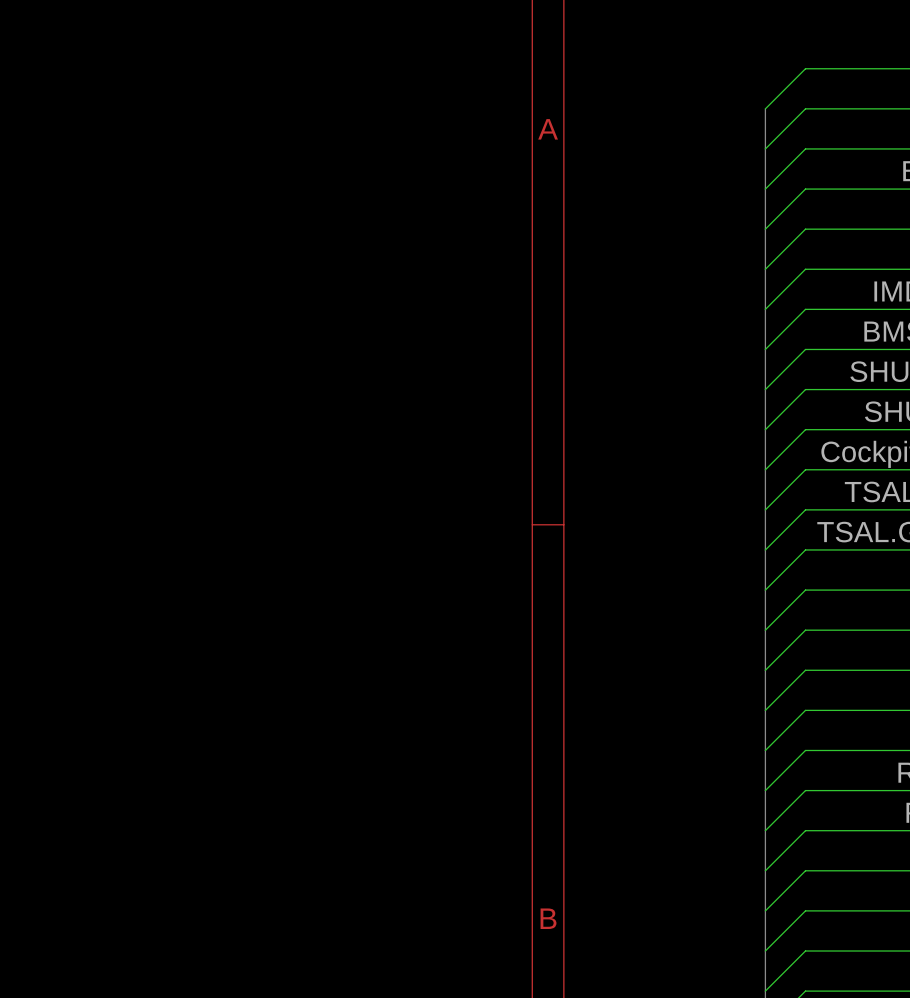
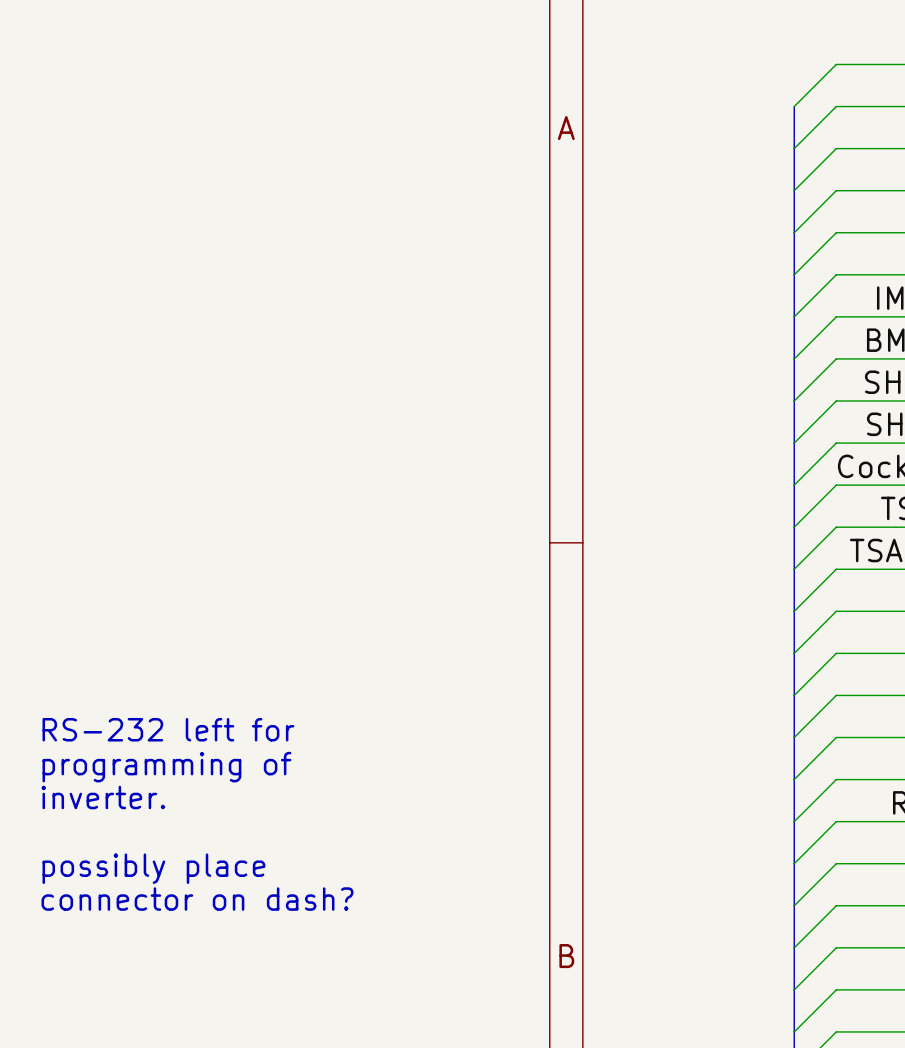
text: none -> RS-232 left for (168, 729)
text: none -> programming of (166, 767)
text: none -> inverter. (103, 797)
text: none -> possibly place (153, 868)
text: none -> connector on dash? (197, 899)

